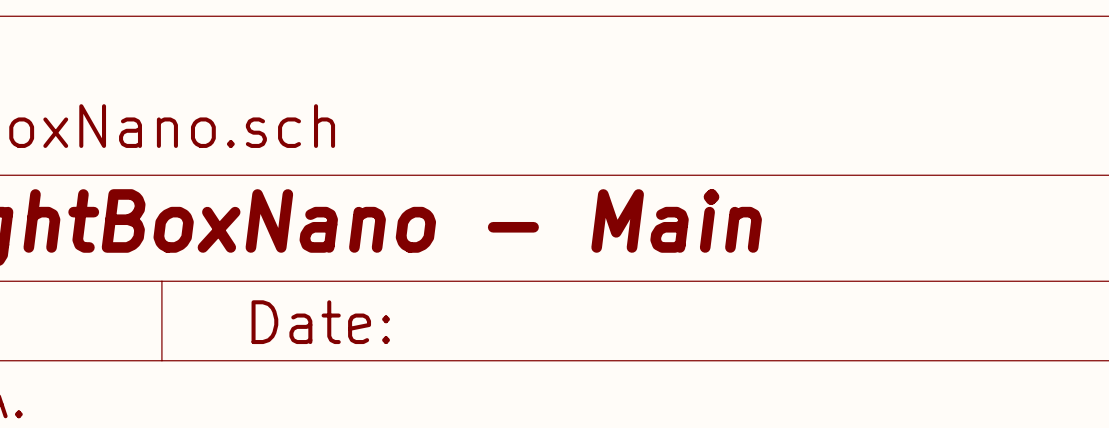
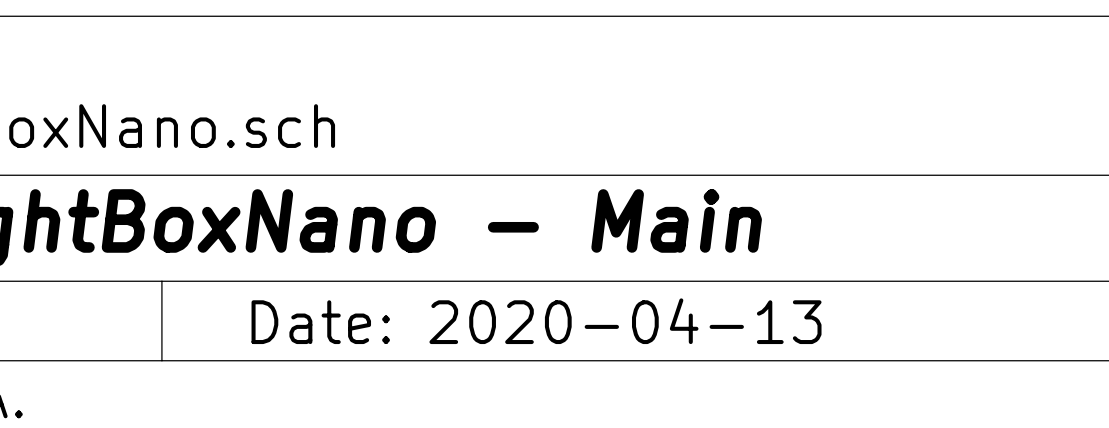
title block: Date: (320, 322) -> Date: 2020-04-13 (536, 321)

